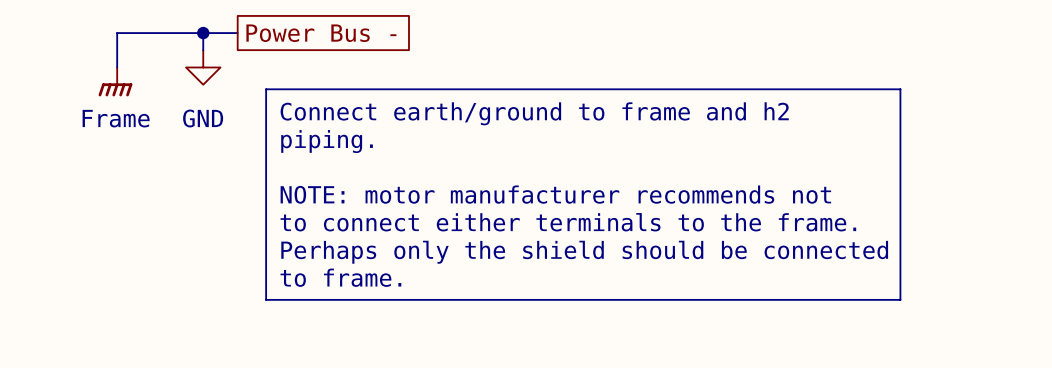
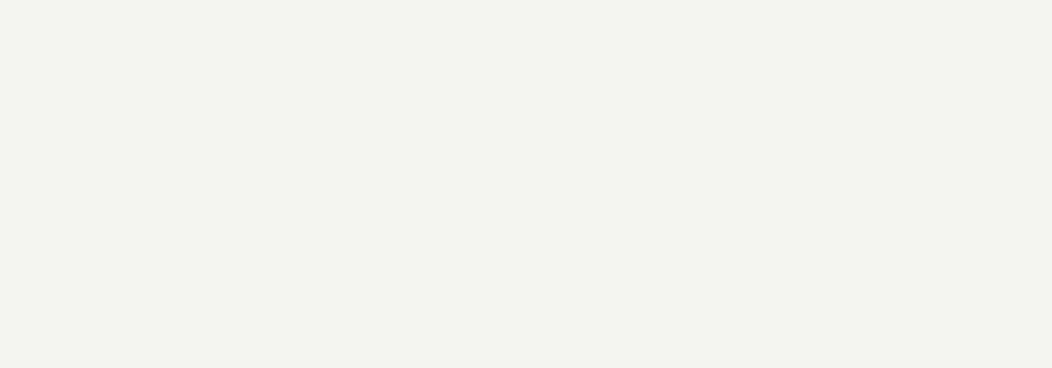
wire: (203, 33) (203, 50) -> none
junction: (203, 33) -> none
wire: (237, 33) (117, 33) (117, 67) -> none
global label: Power Bus - (321, 33) -> none
power symbol: GND (203, 67) -> none
power symbol: Frame (115, 81) -> none
line: (266, 89) (900, 89) (900, 299) (266, 299) (266, 89) -> none
text: Connect earth/ground to frame and h2 (534, 113) -> none
text: piping. (327, 141) -> none
text: NOTE: motor manufacturer recommends not (555, 194) -> none
text: to connect either terminals to the frame. (568, 222) -> none
text: Perhaps only the shield should be connected (584, 252) -> none
text: to frame. (340, 277) -> none

